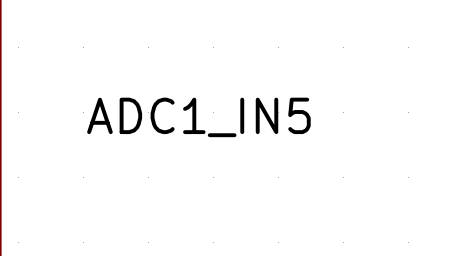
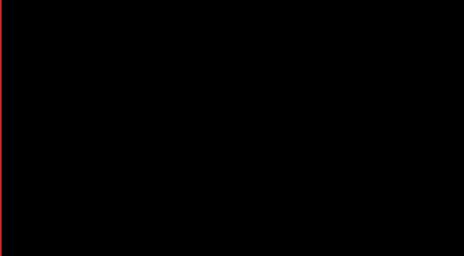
label: ADC1_IN5 (198, 117) -> none

